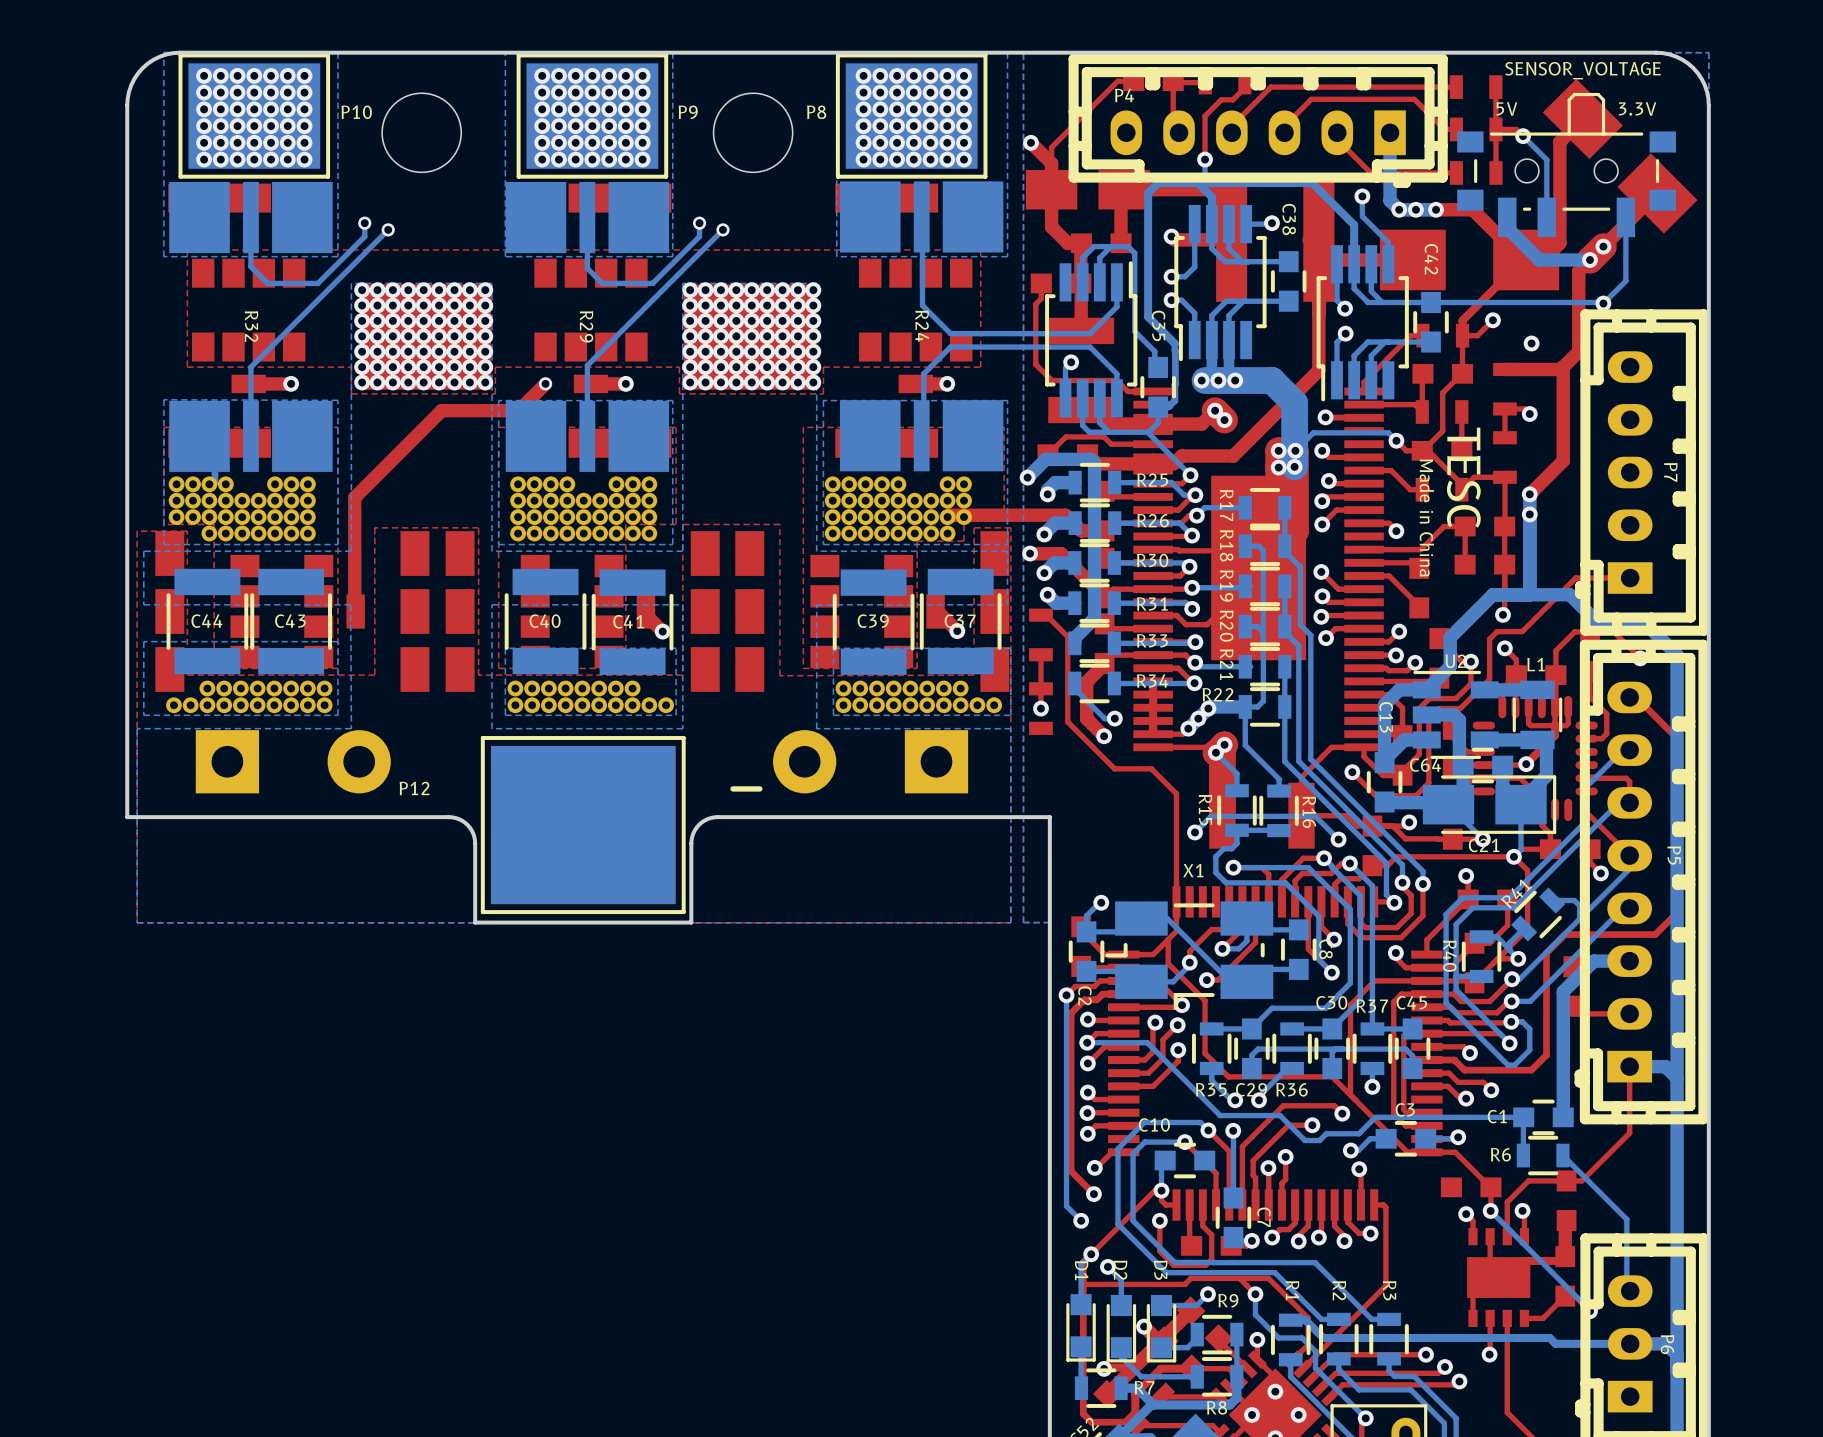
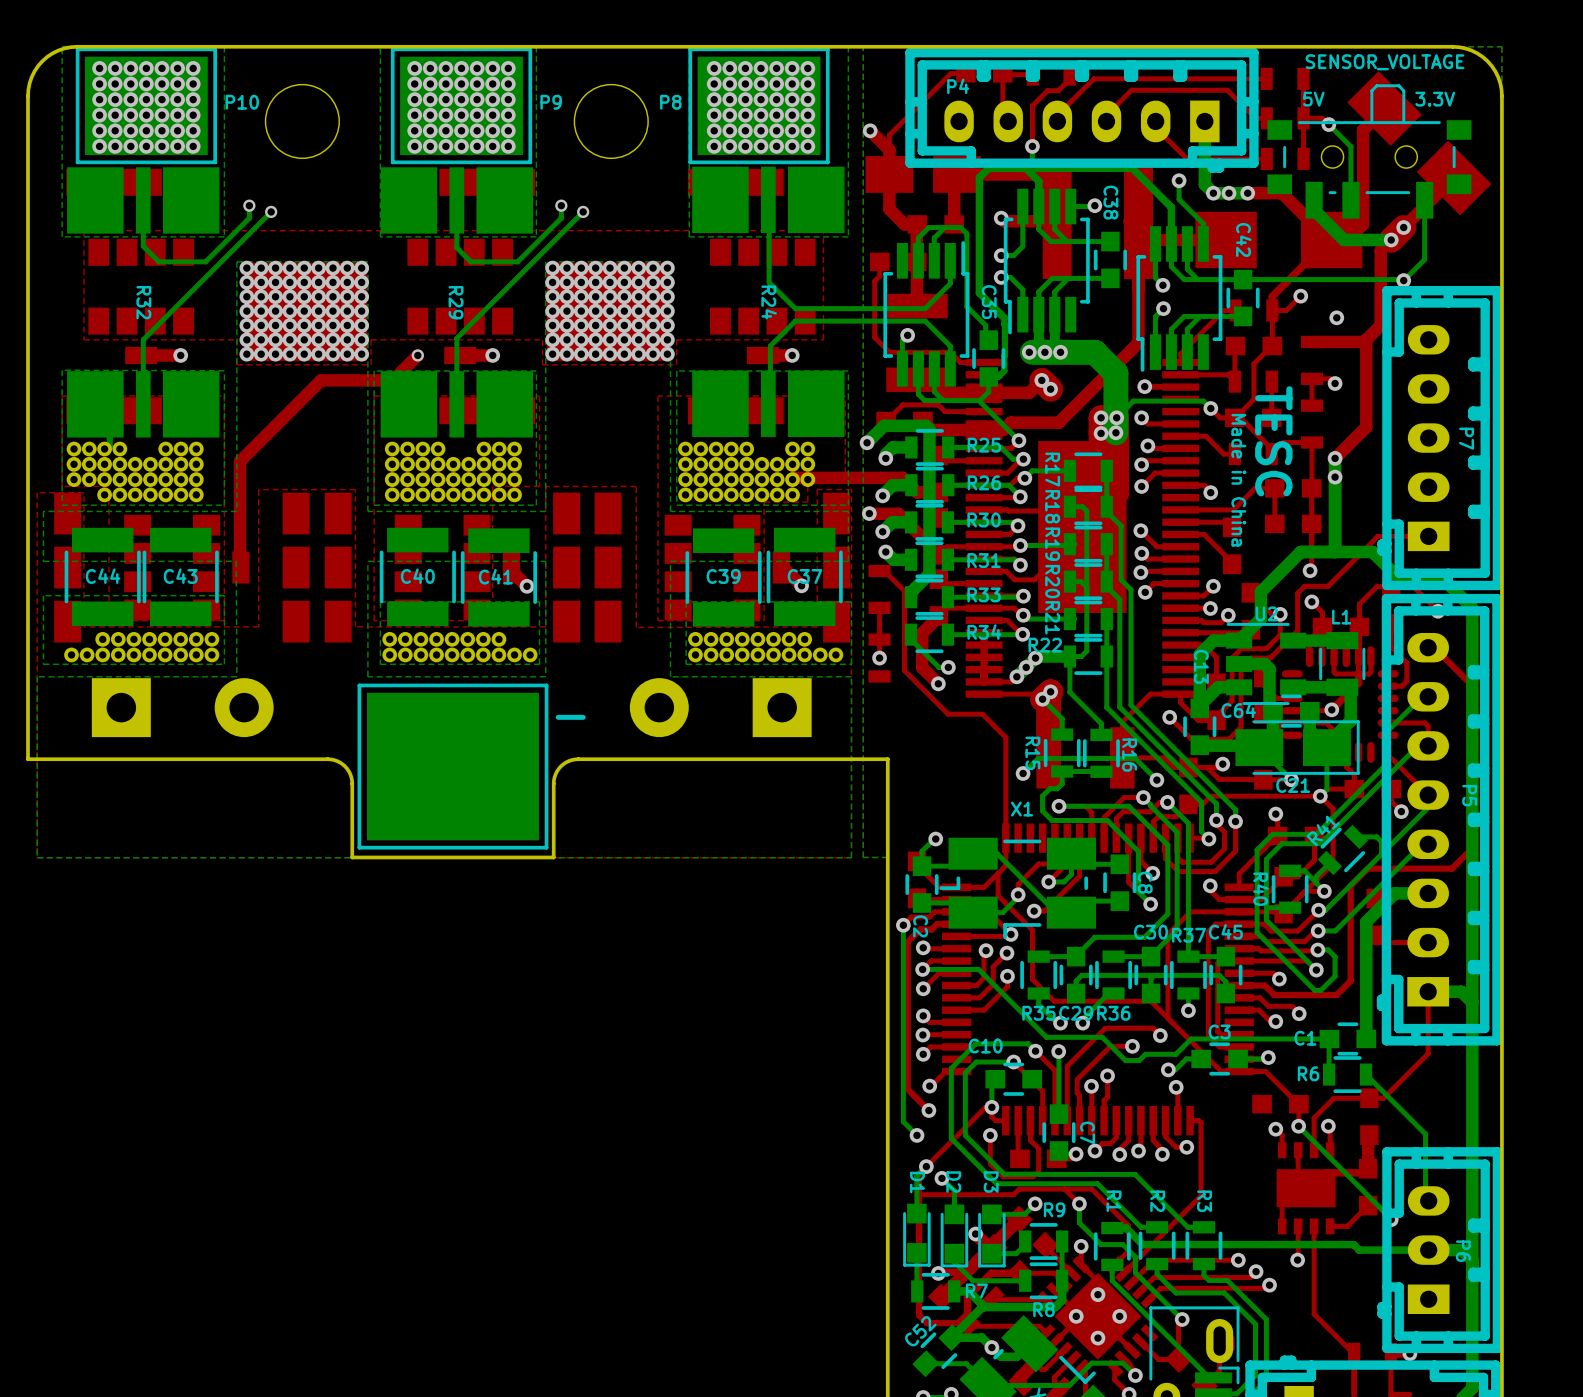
P12 name: P12 (414, 788) -> none
line: (759, 788) (733, 788) -> (583, 717) (558, 717)

